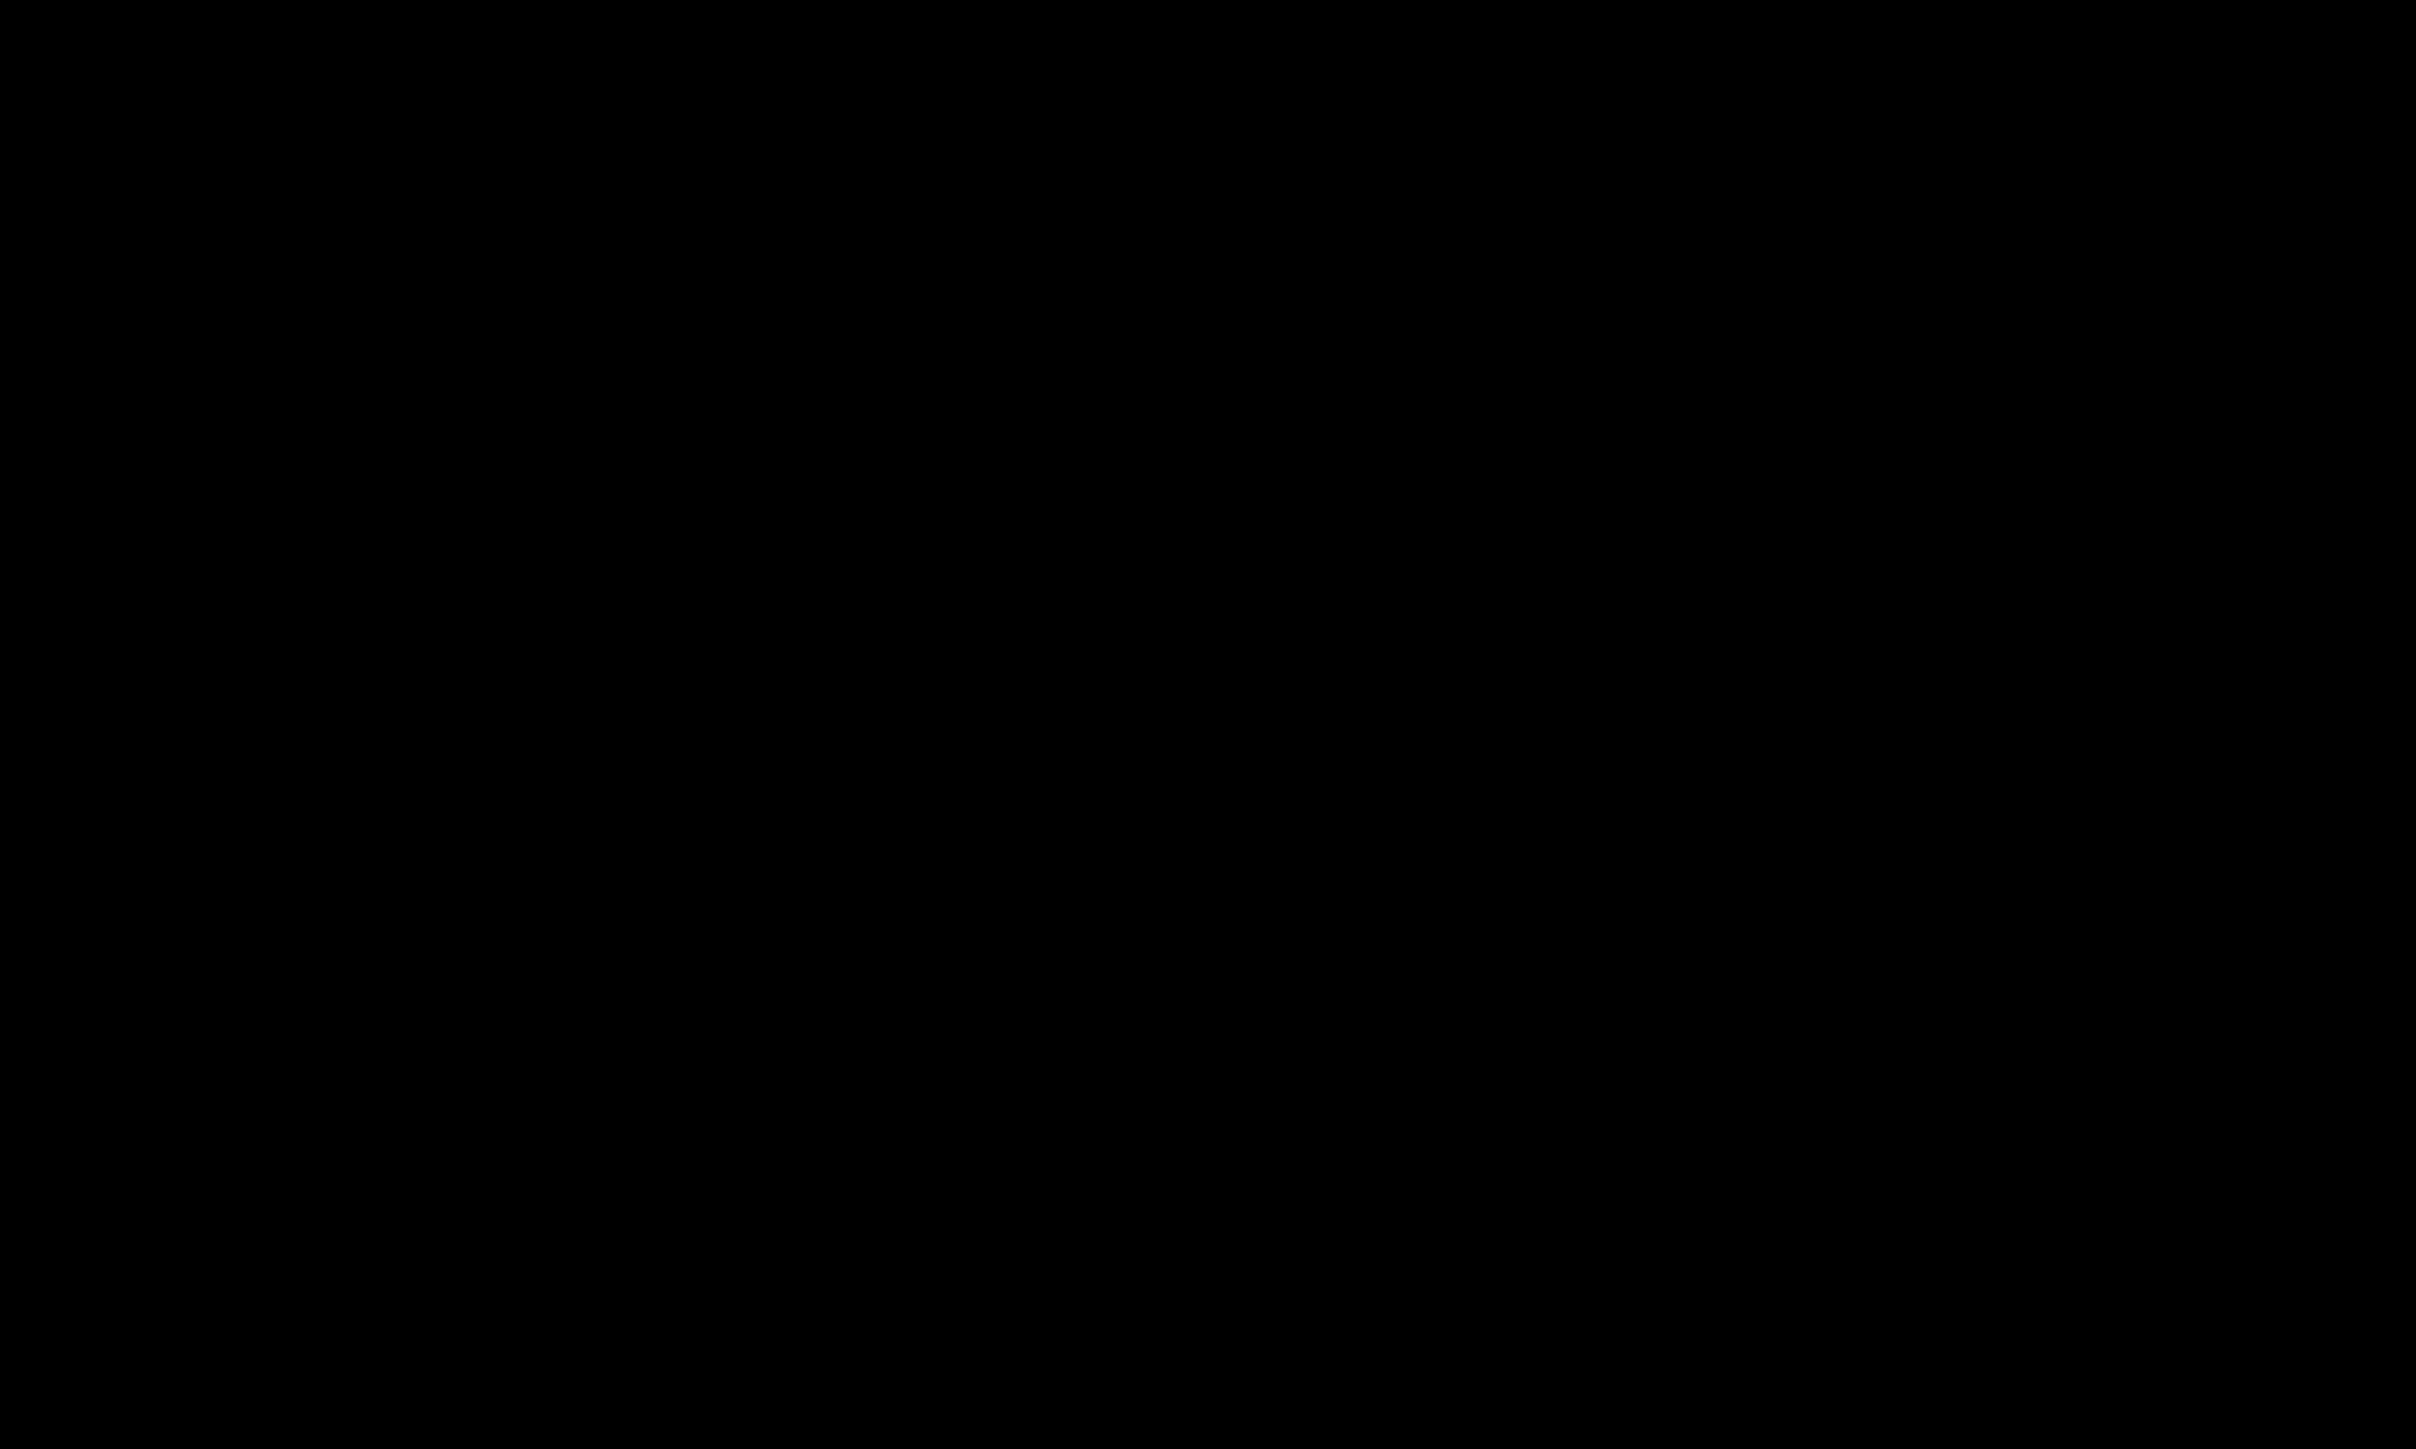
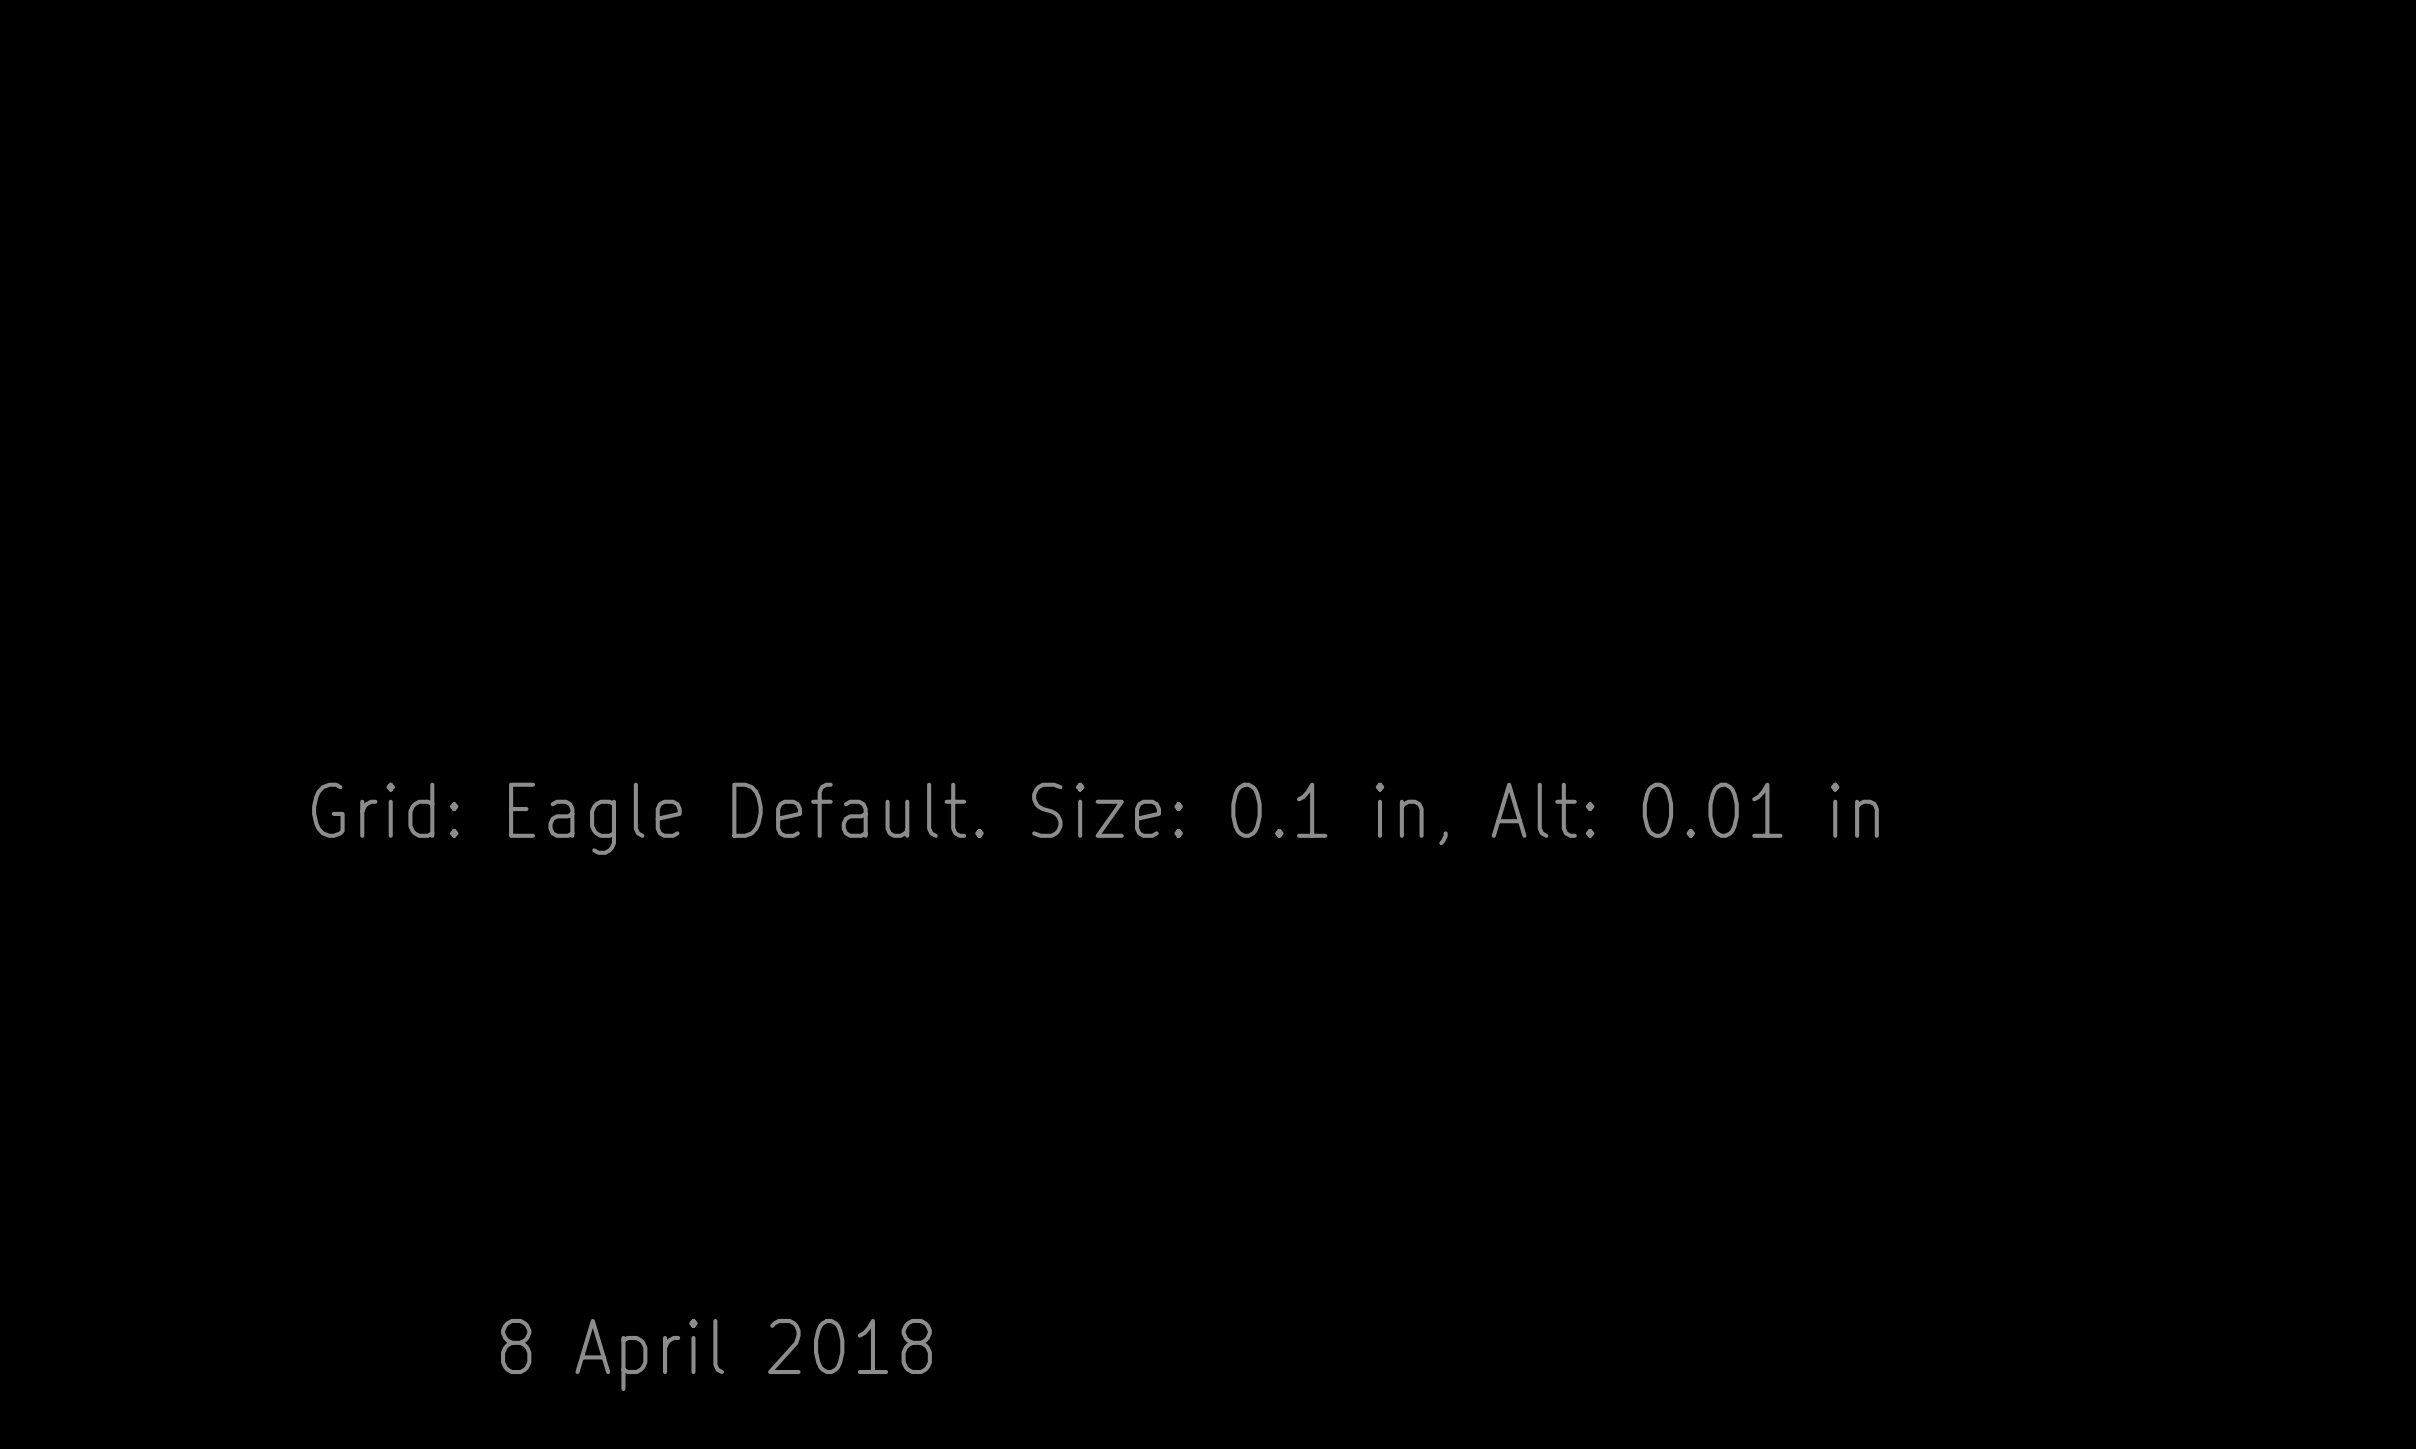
text: none -> Grid: Eagle Default. Size: 0.1 in, Alt: 0.01 in (1095, 818)
text: none -> 8 April 2018 (716, 1354)

